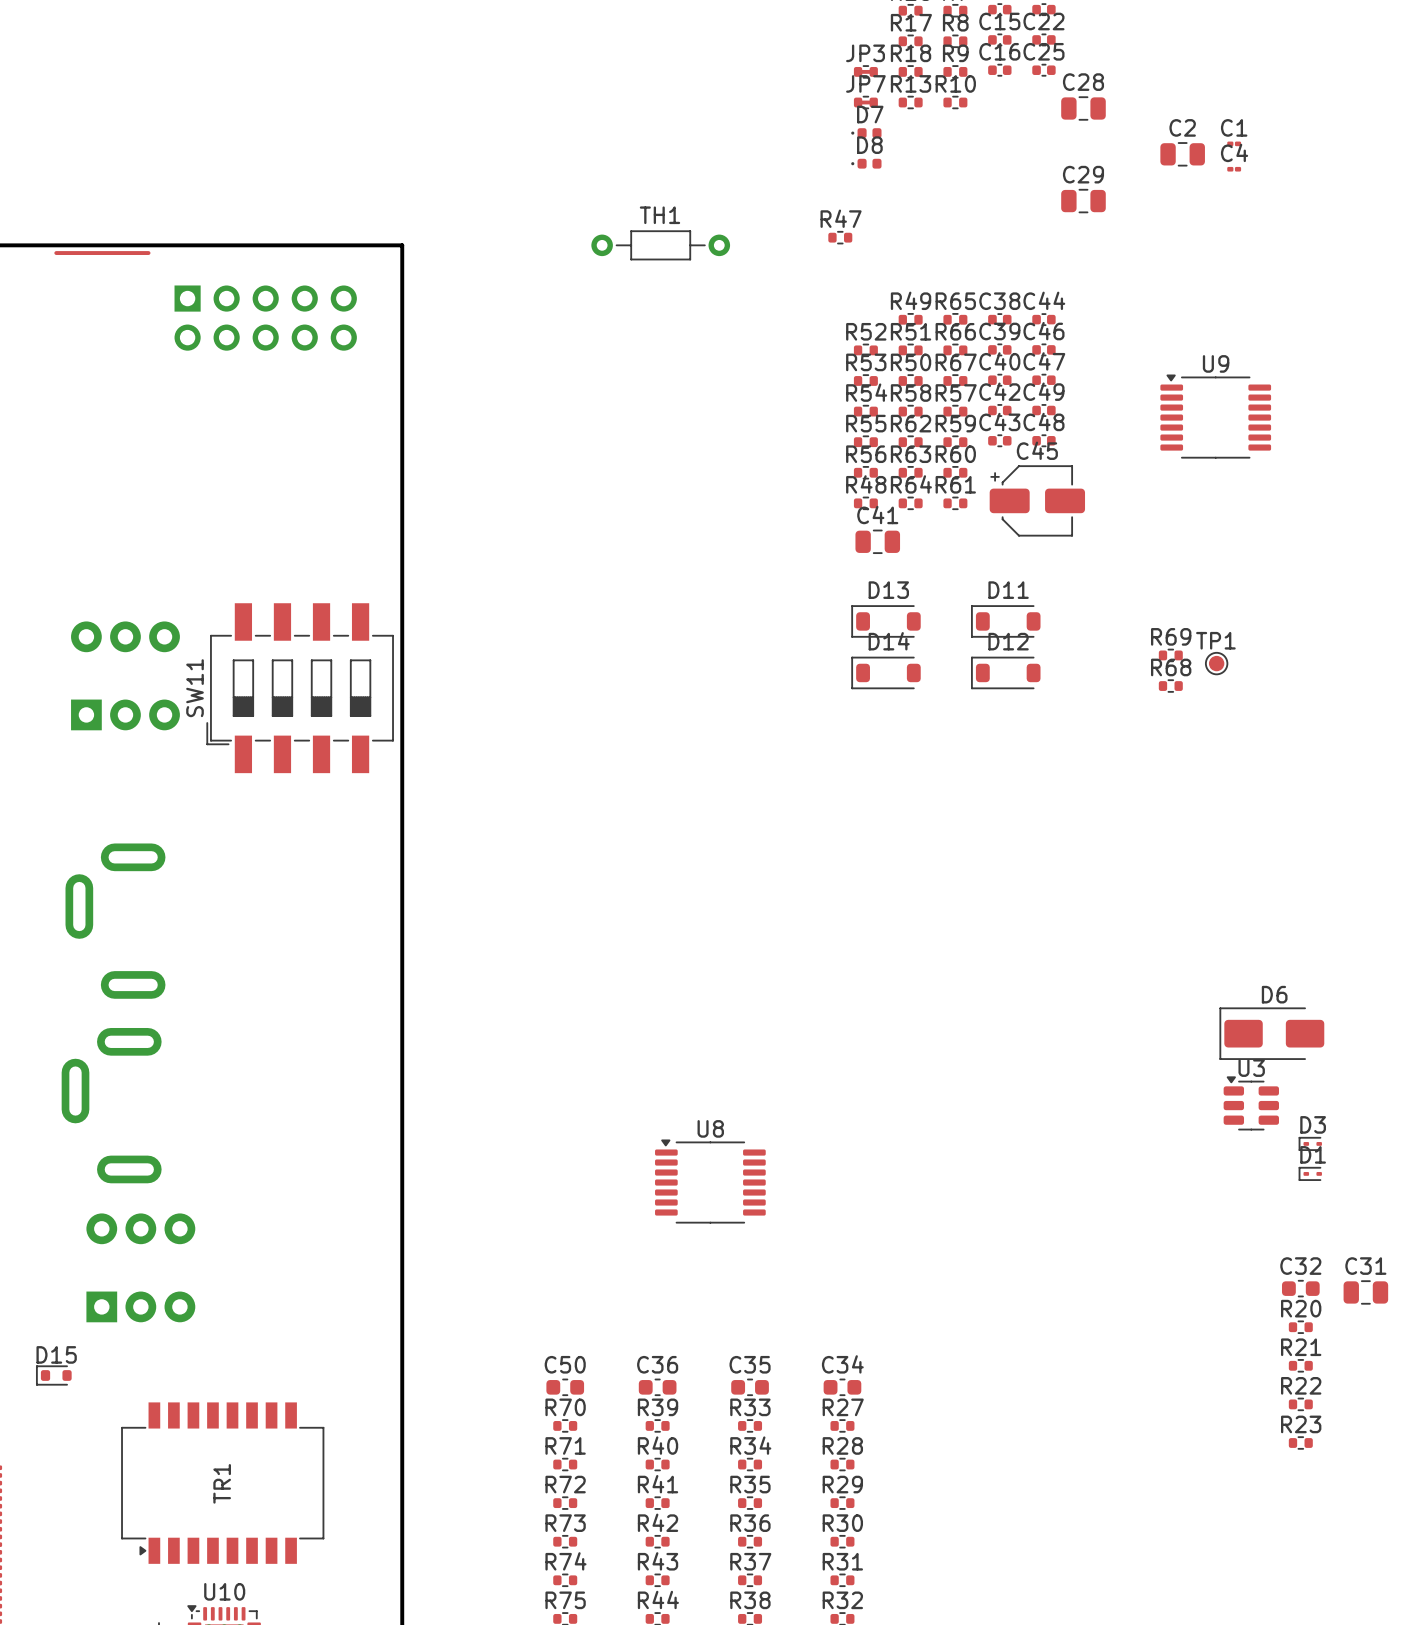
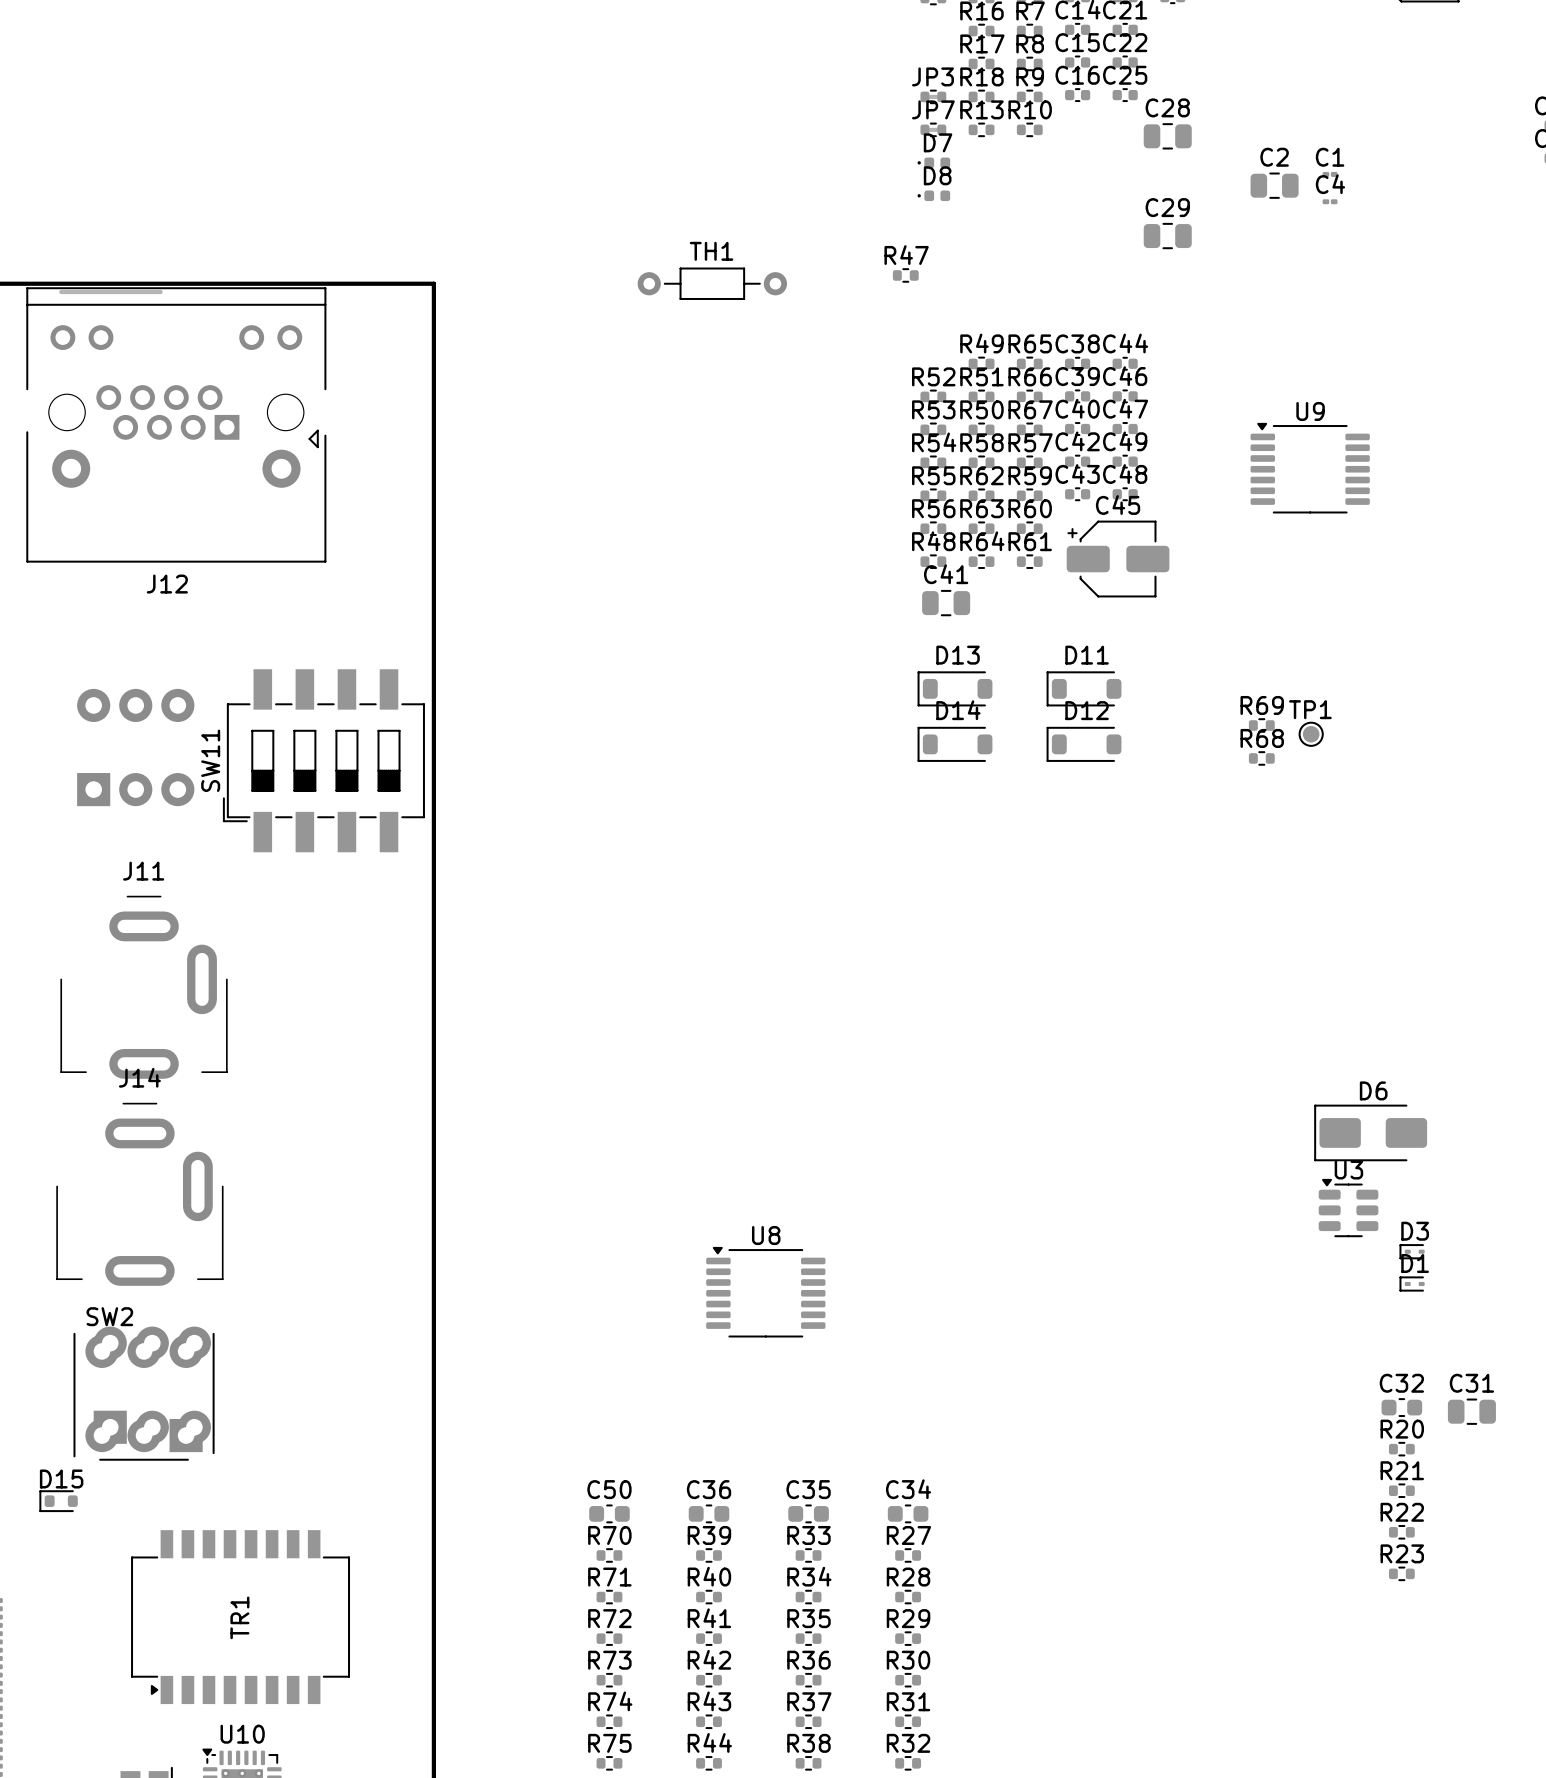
part: (265, 318) -> none
J12: none -> (176, 424)
J11: none -> (144, 987)
part: (115, 921) -> none
J14: none -> (139, 1194)
part: (111, 1105) -> none
SW2: none -> (144, 1396)

